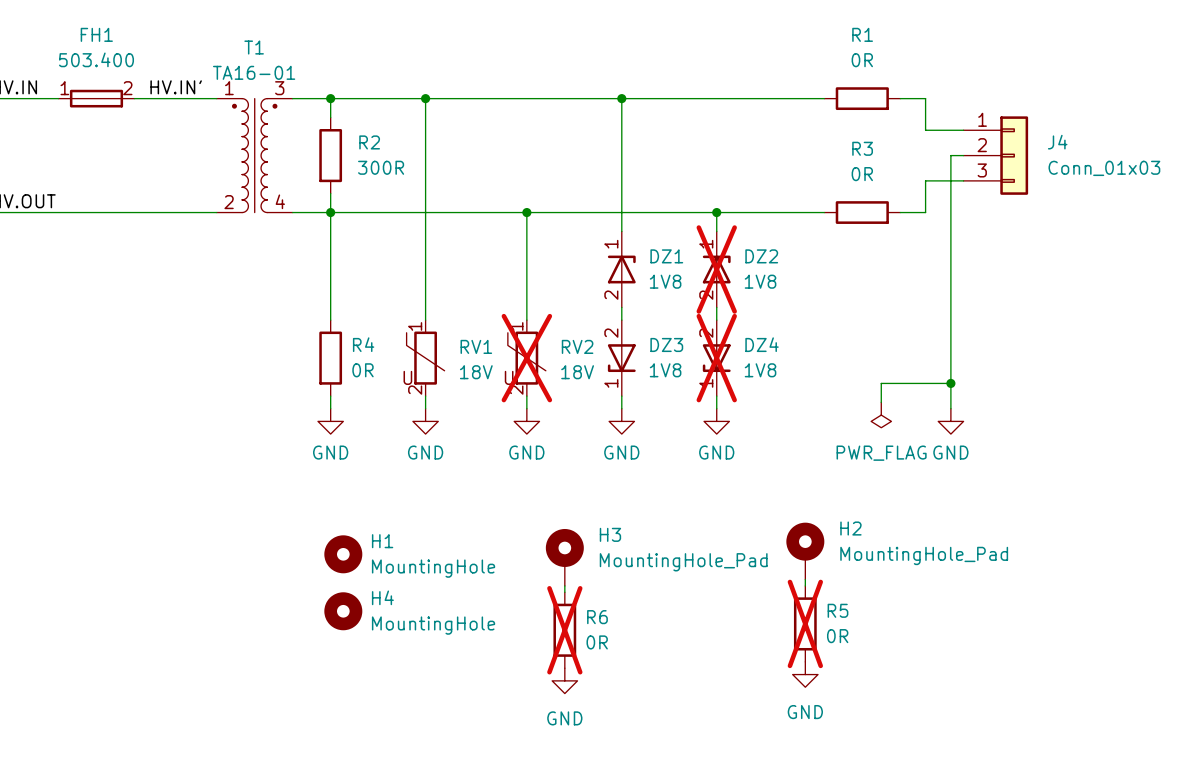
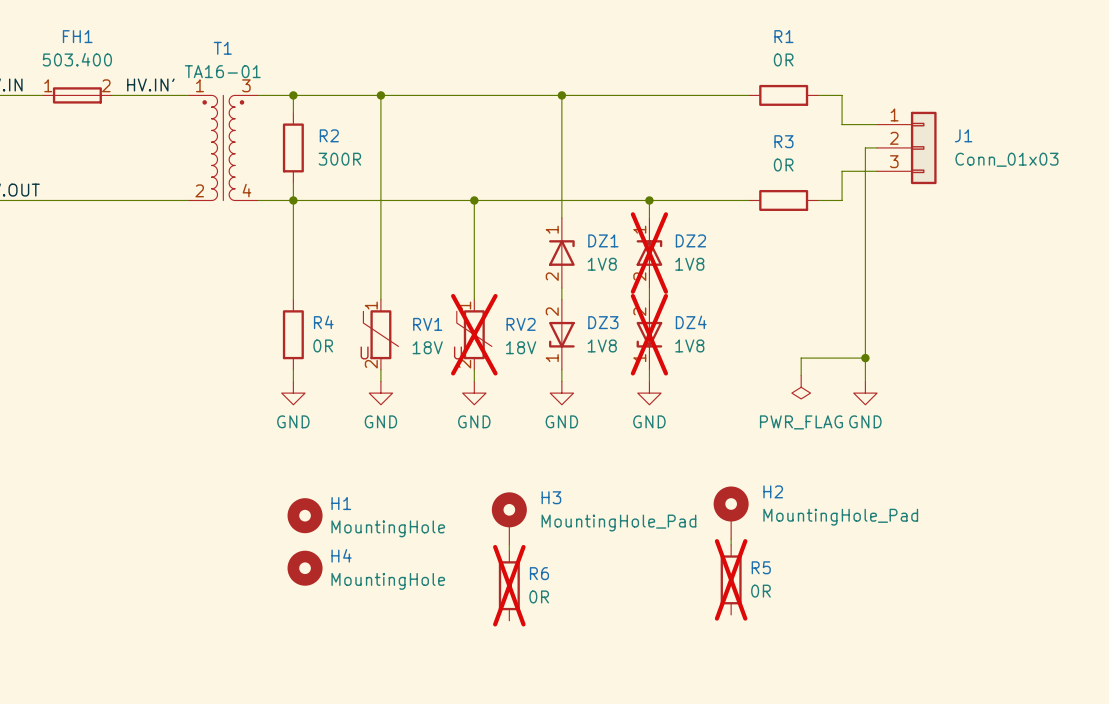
J4 name: J4 (1057, 142) -> J1 (963, 135)
power symbol: GND (805, 674) -> none
power symbol: GND (564, 680) -> none

